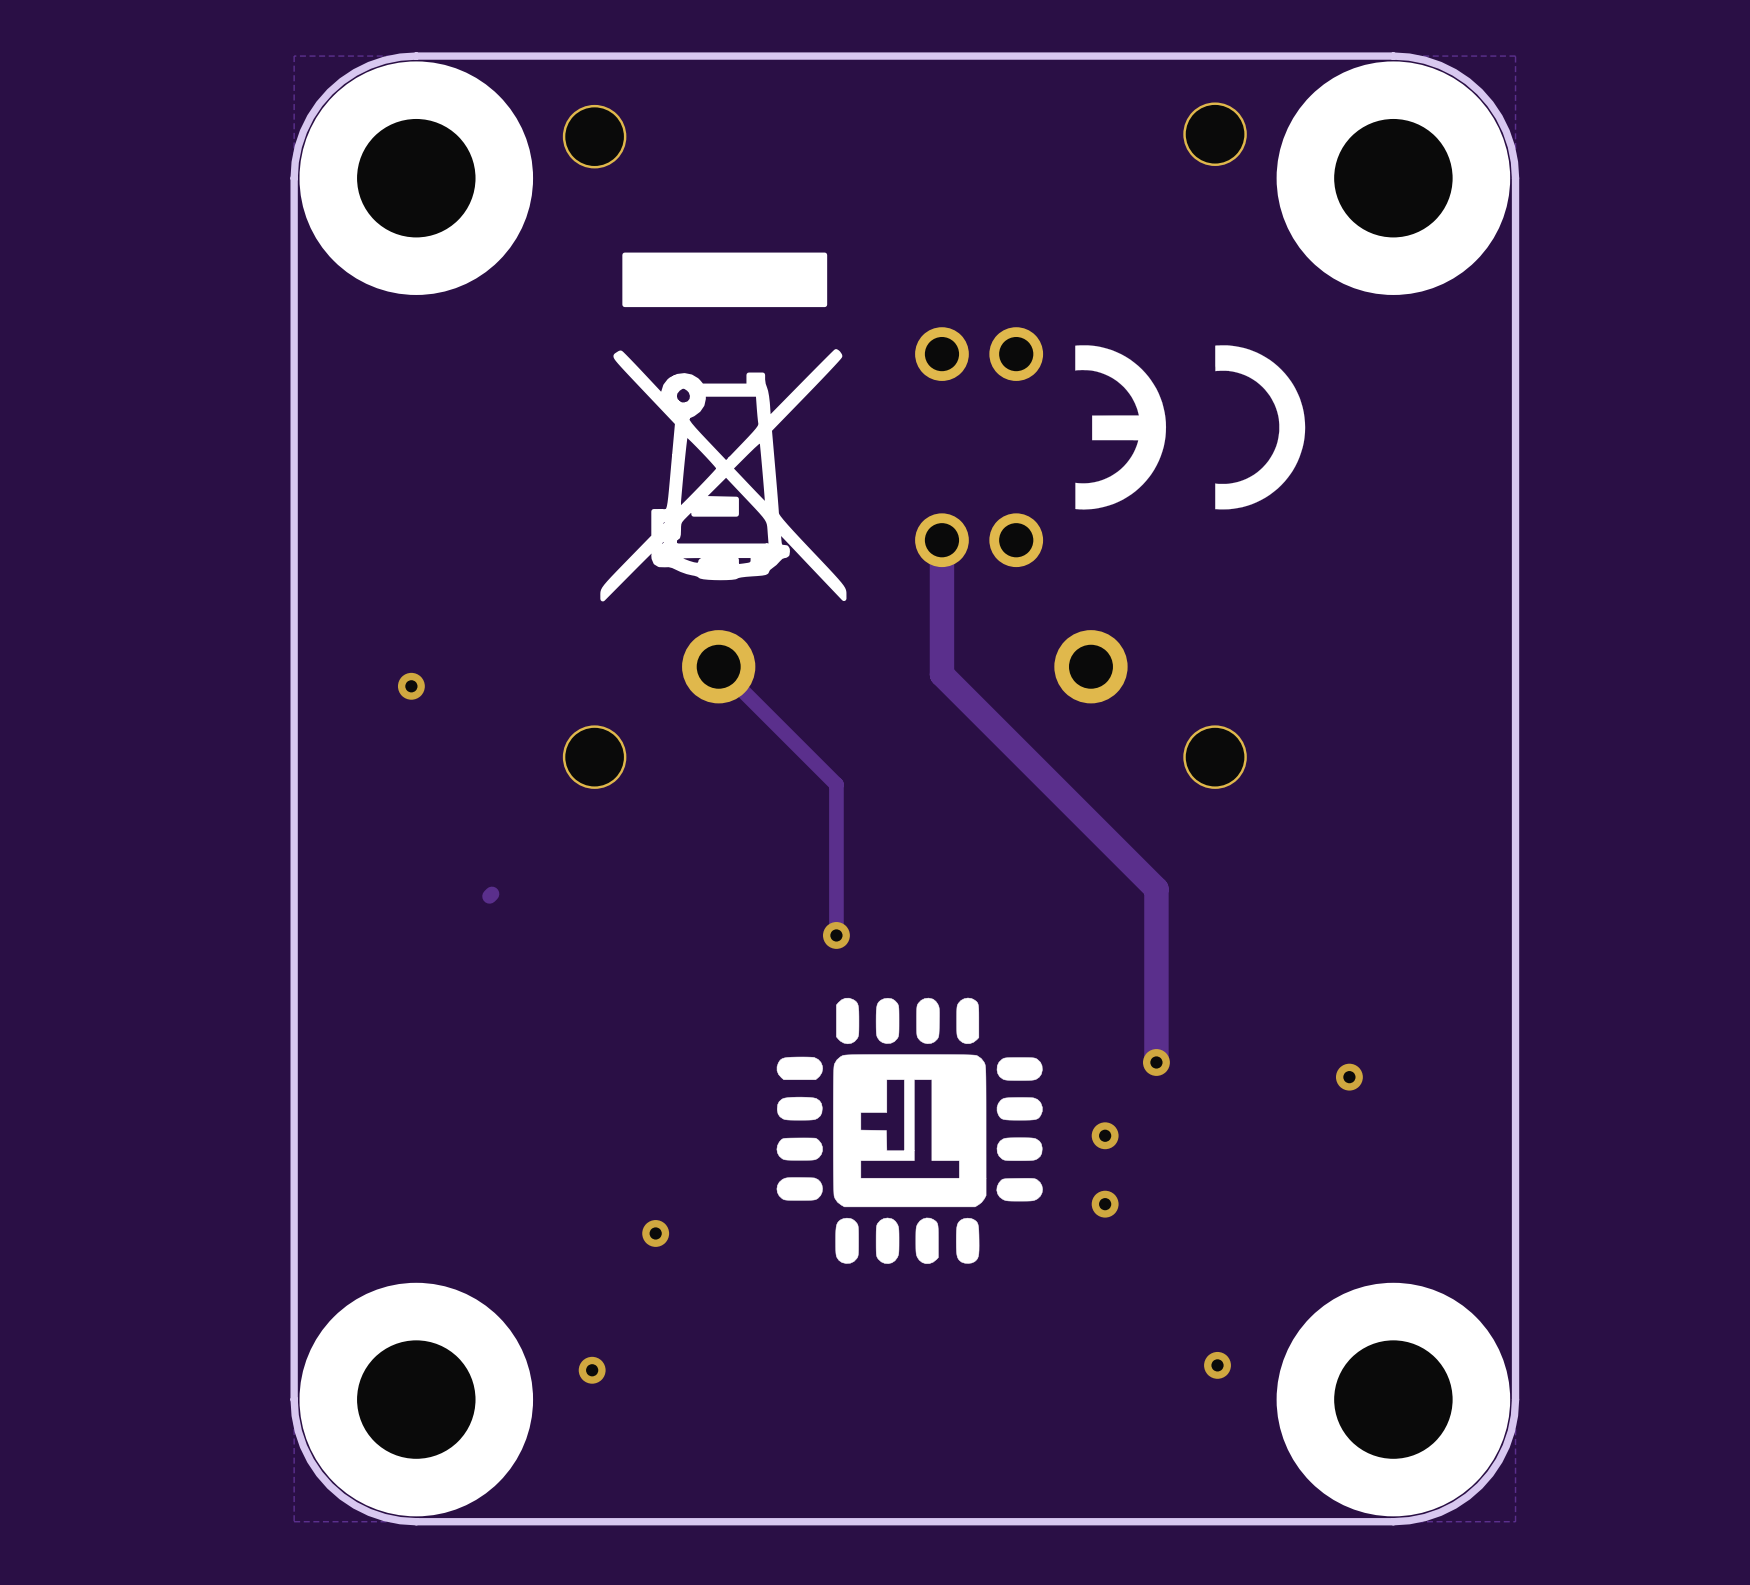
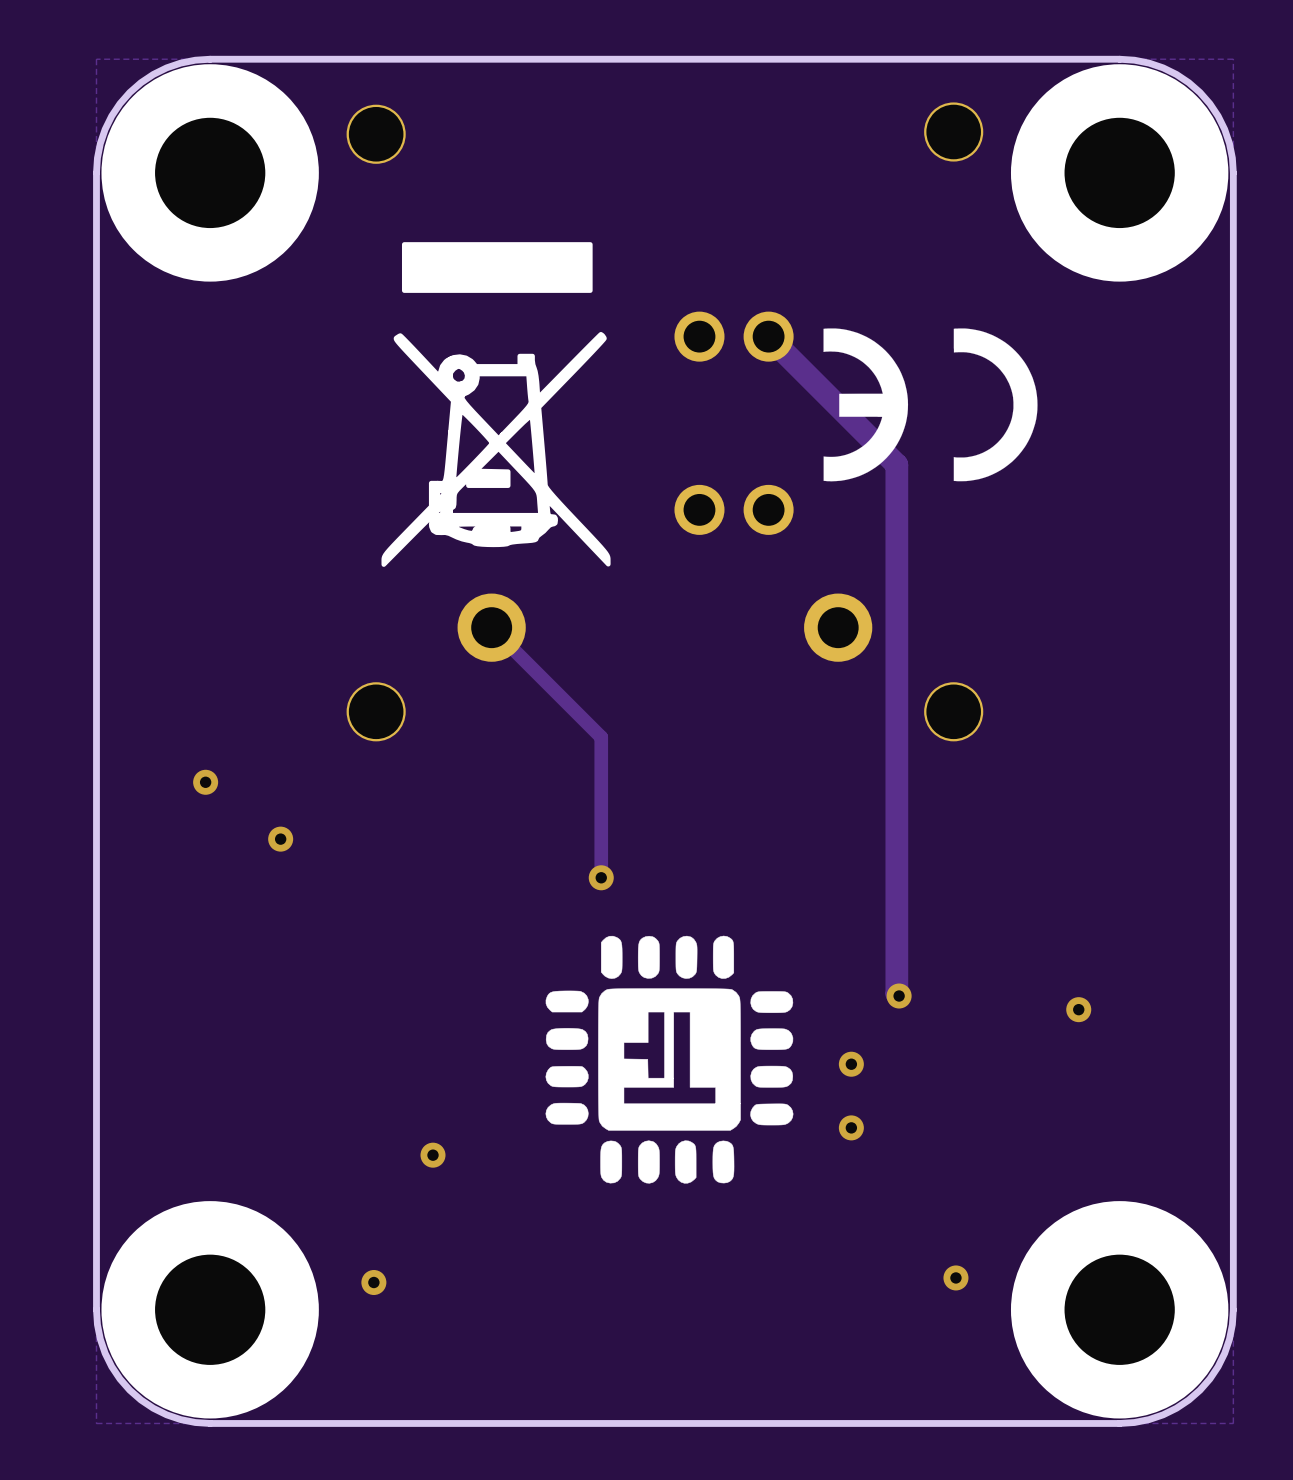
track: (941, 540) (941, 674) (1156, 889) (1156, 1062) -> (768, 336) (896, 464) (896, 993) (899, 996)
via: (411, 686) -> none
via: none -> (205, 782)
via: none -> (280, 839)

